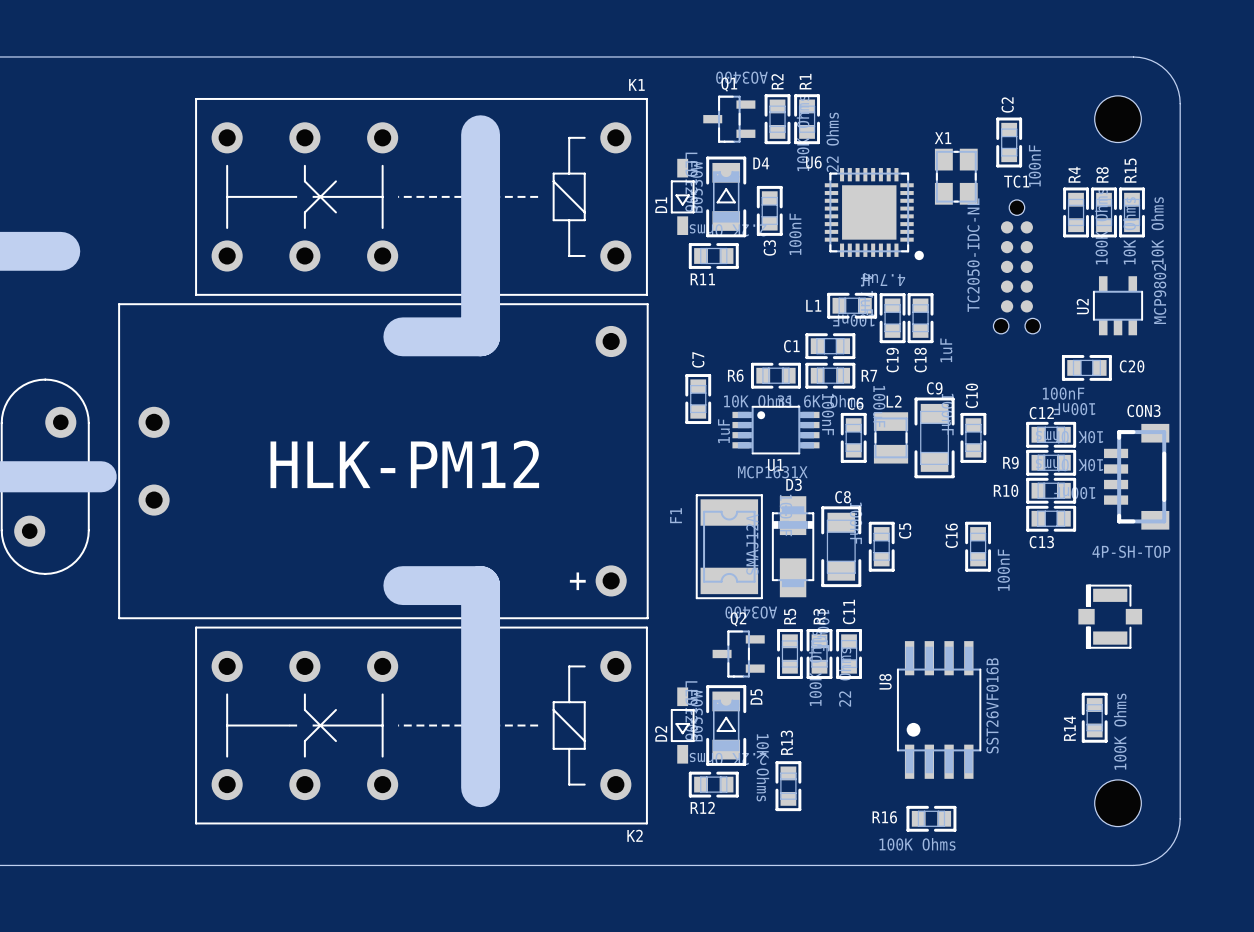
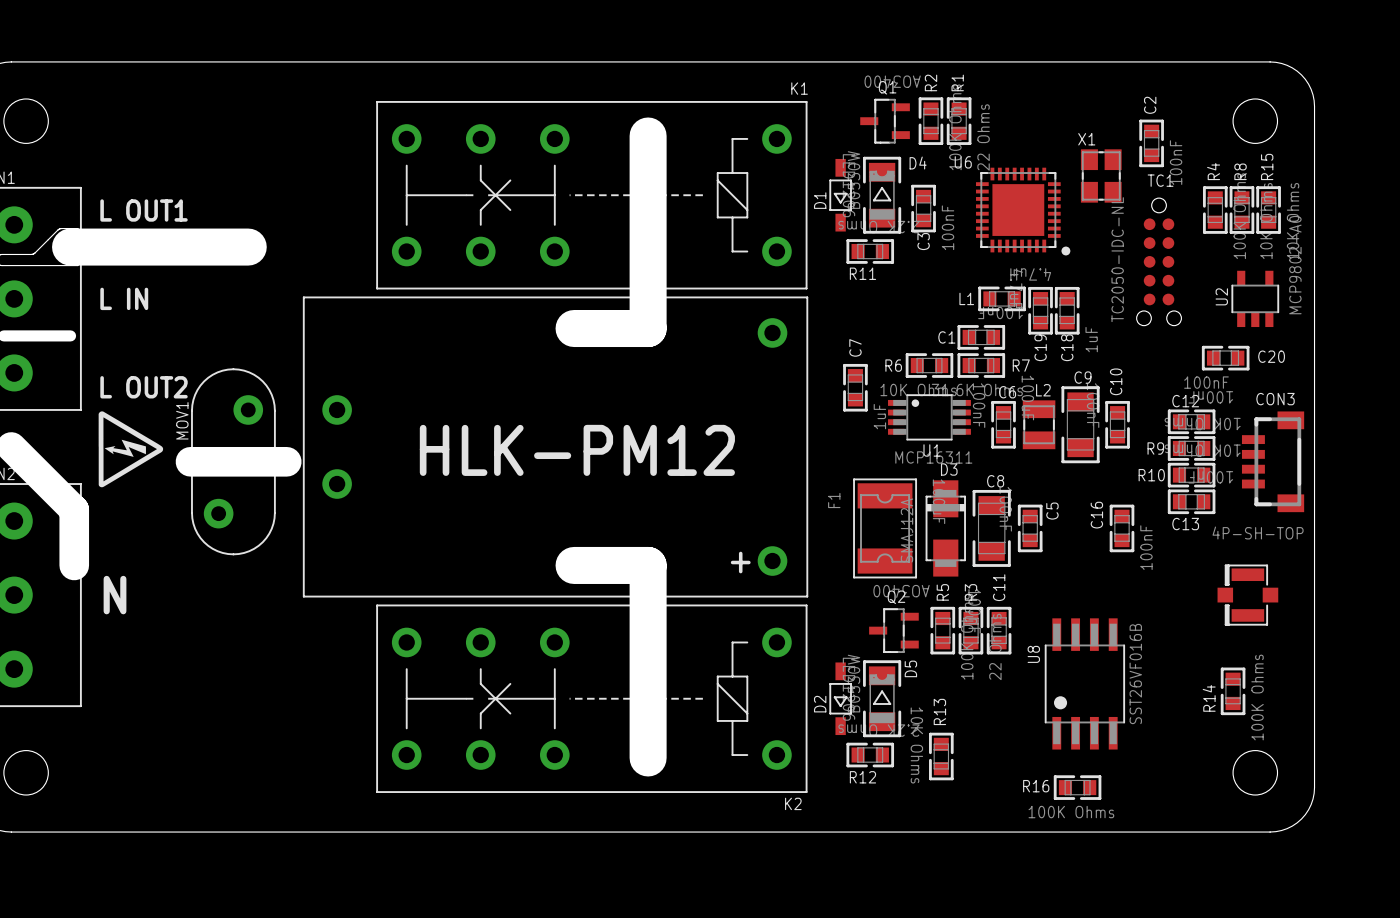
U2 value: MCP9802 (1160, 294) -> MCP9802-A0 (1295, 265)
U1 value: MCP1631X (772, 472) -> MCP16311 (933, 457)

